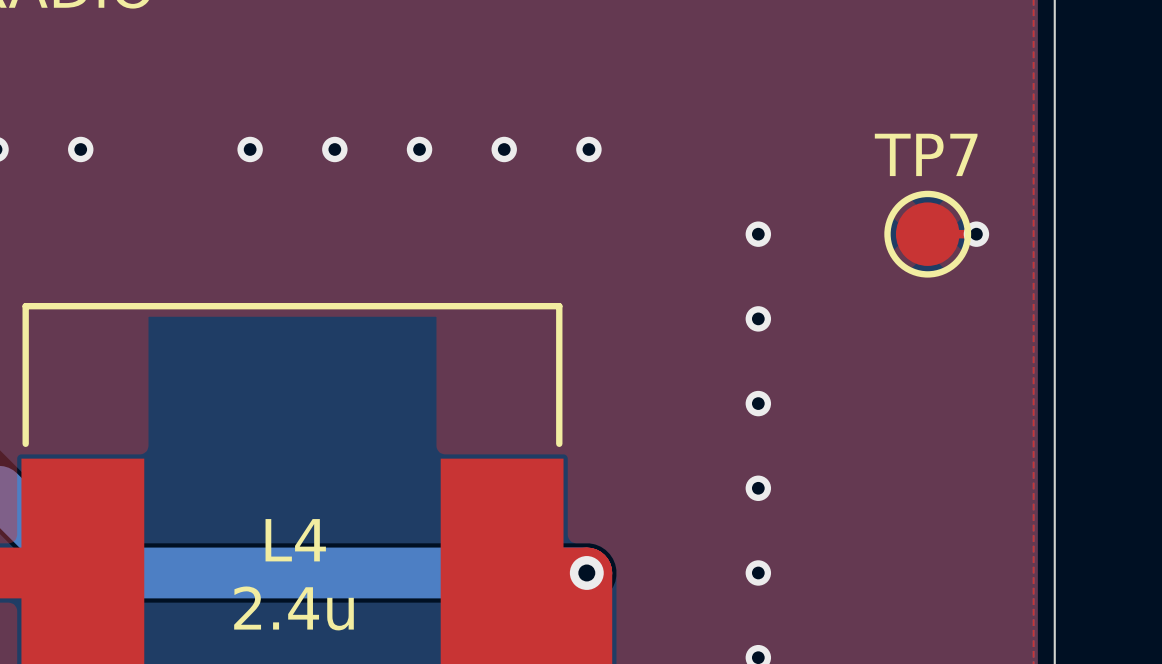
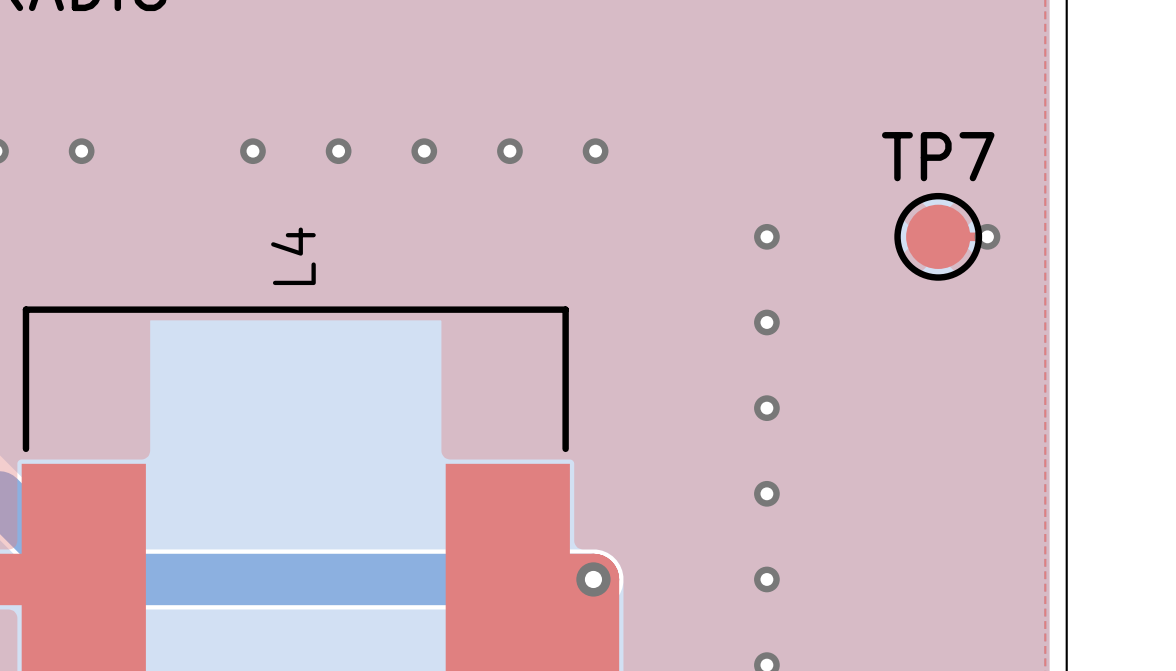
text rotation: 0° (295, 540) -> 90° counterclockwise (293, 256)
text position: L4 (295, 540) -> L4 (293, 256)
text: 2.4u (293, 608) -> none

